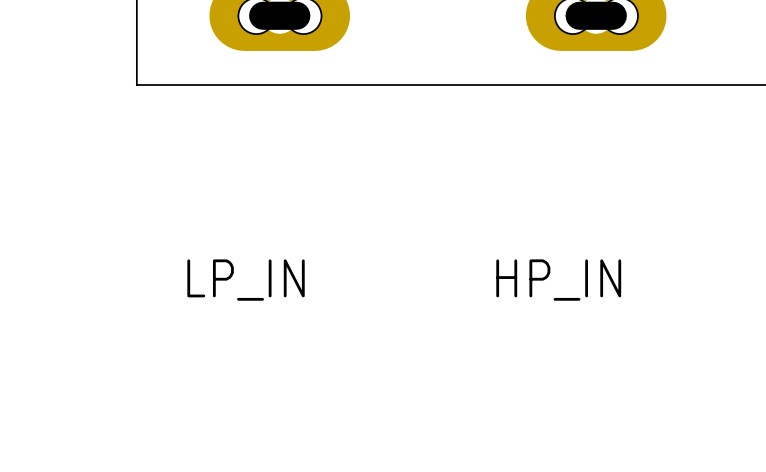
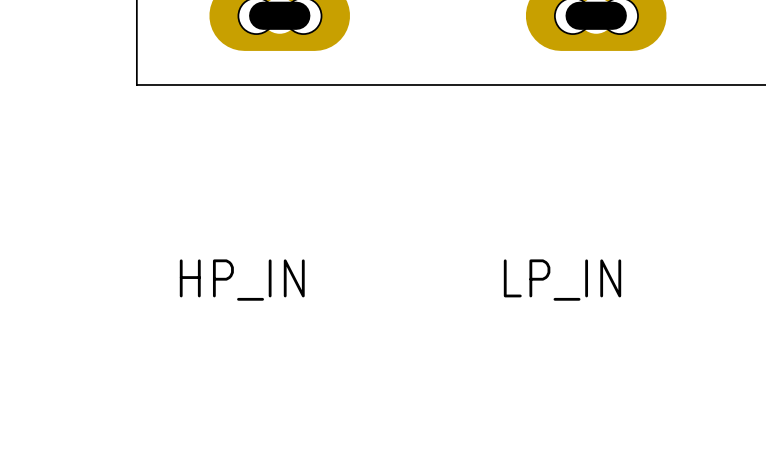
LP_IN name: LP_IN (246, 280) -> HP_IN (242, 280)
HP_IN name: HP_IN (558, 280) -> LP_IN (562, 280)

